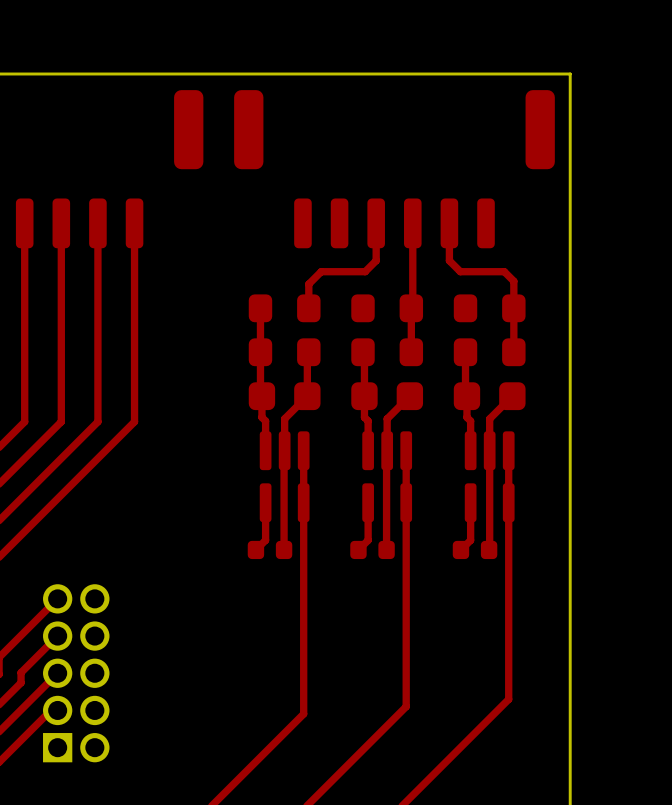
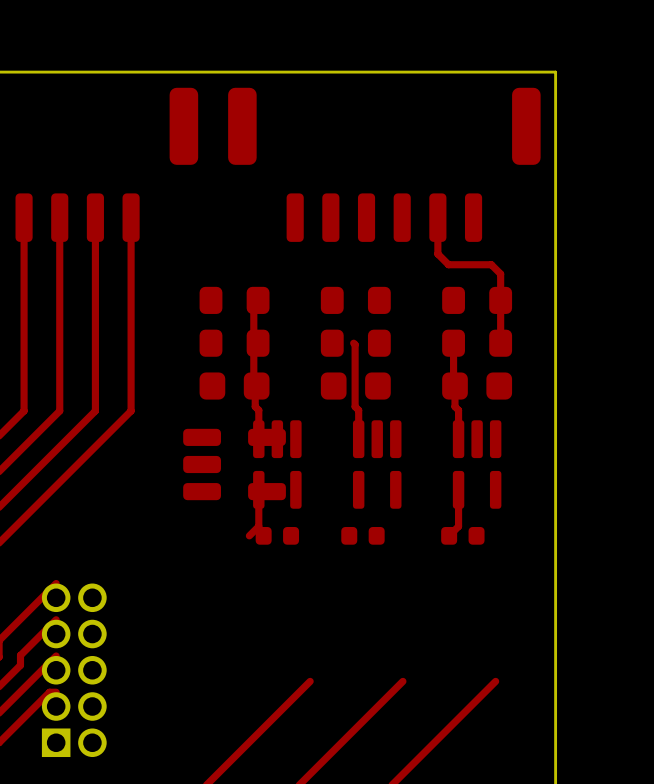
top track: (376, 223) (376, 260) (365, 271) (321, 271) (308, 284) (308, 308) -> none
top track: (412, 223) (411, 352) -> none
part: none -> (234, 300)
part: (284, 308) -> none
part position: (387, 308) -> (355, 300)
part: none -> (234, 343)
part: (284, 352) -> none
top track: (308, 352) (307, 396) (284, 418) (284, 549) -> none
part position: (387, 352) -> (355, 343)
part position: (284, 396) -> (234, 386)
part position: (387, 396) -> (355, 386)
top track: (409, 396) (387, 418) (386, 549) -> none
top track: (512, 396) (489, 418) (489, 549) -> none
top track: (303, 450) (303, 713) -> (310, 681) (295, 695)
top track: (406, 450) (406, 706) -> (402, 681) (395, 688)
top track: (508, 450) (508, 699) -> none
part: none -> (234, 464)
top track: (368, 502) (368, 540) (358, 549) -> none
part position: (270, 549) -> (277, 535)
part position: (76, 673) -> (74, 670)

